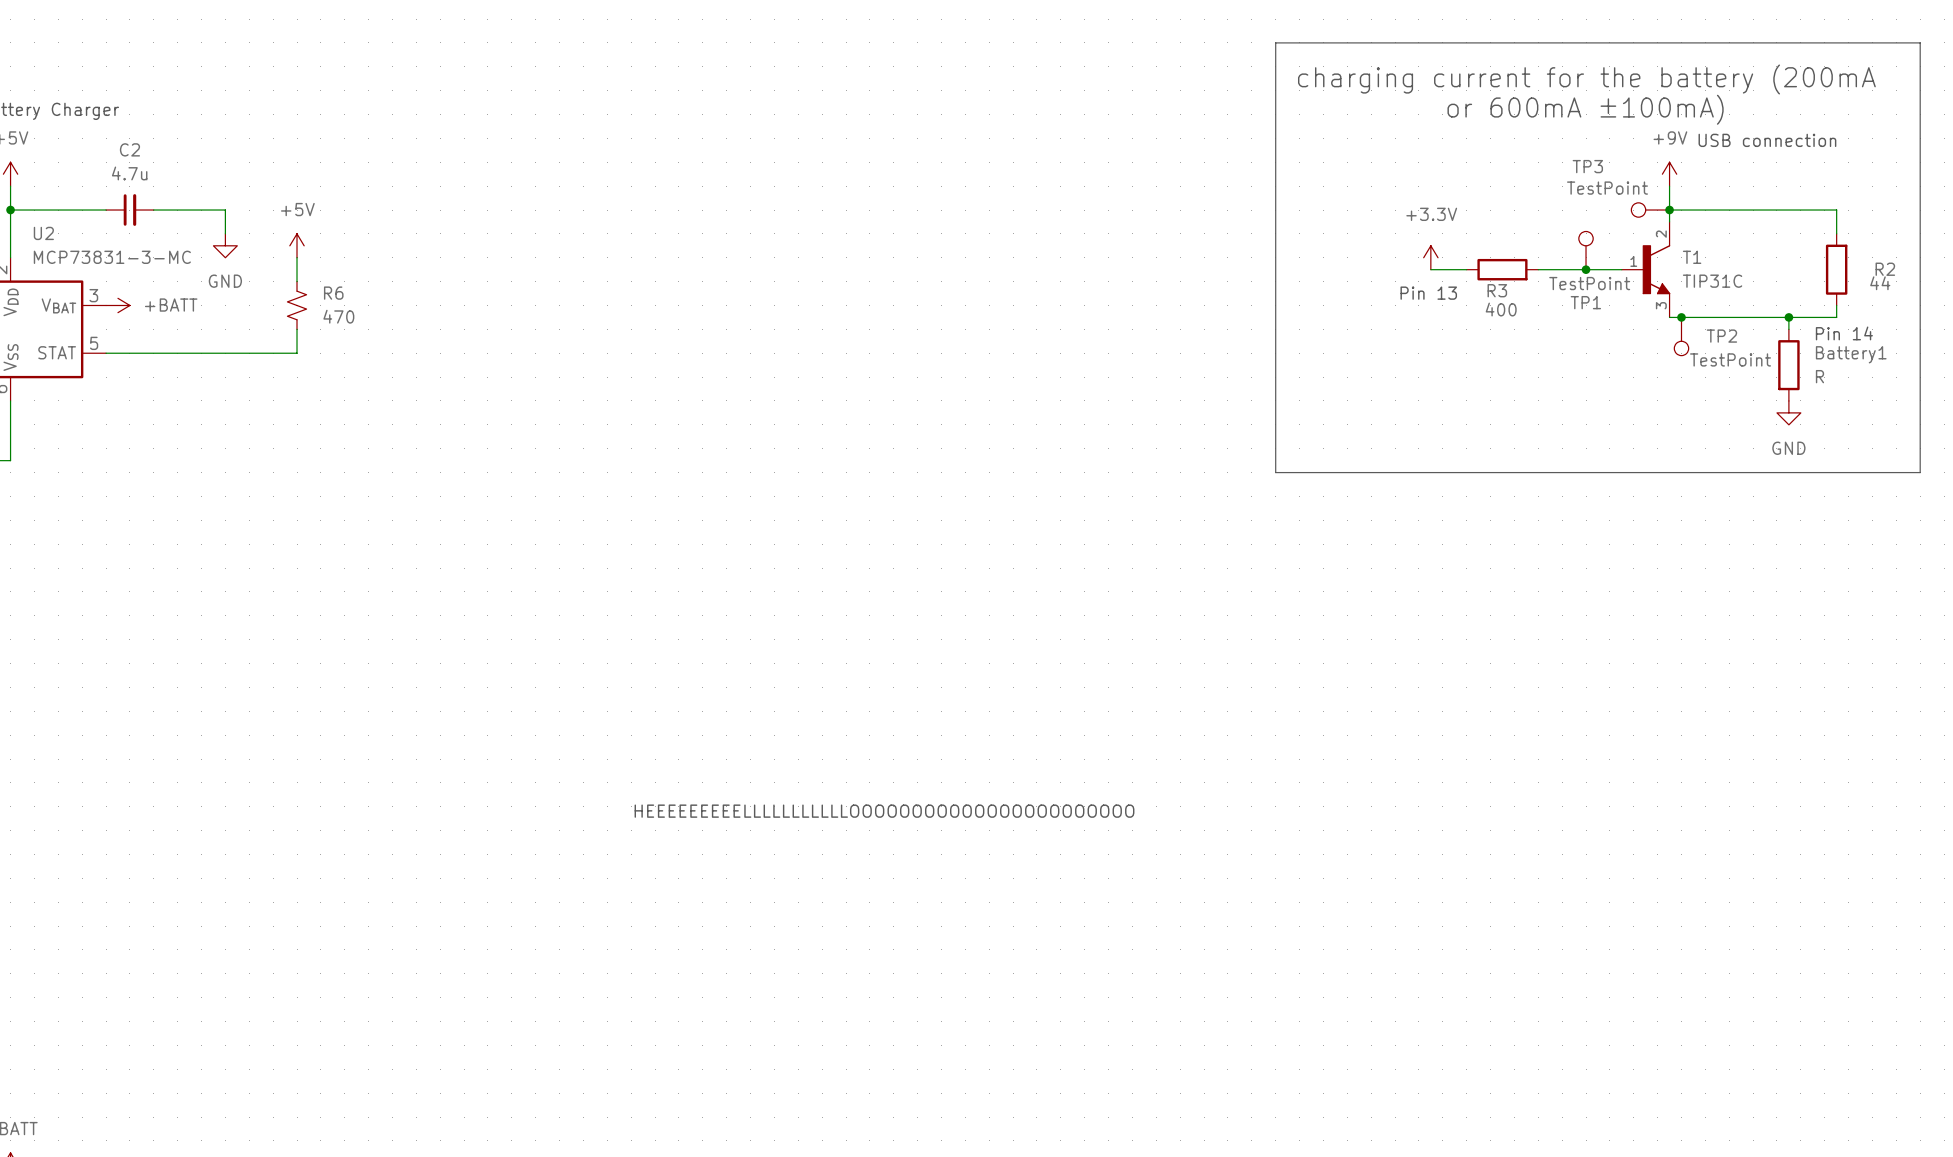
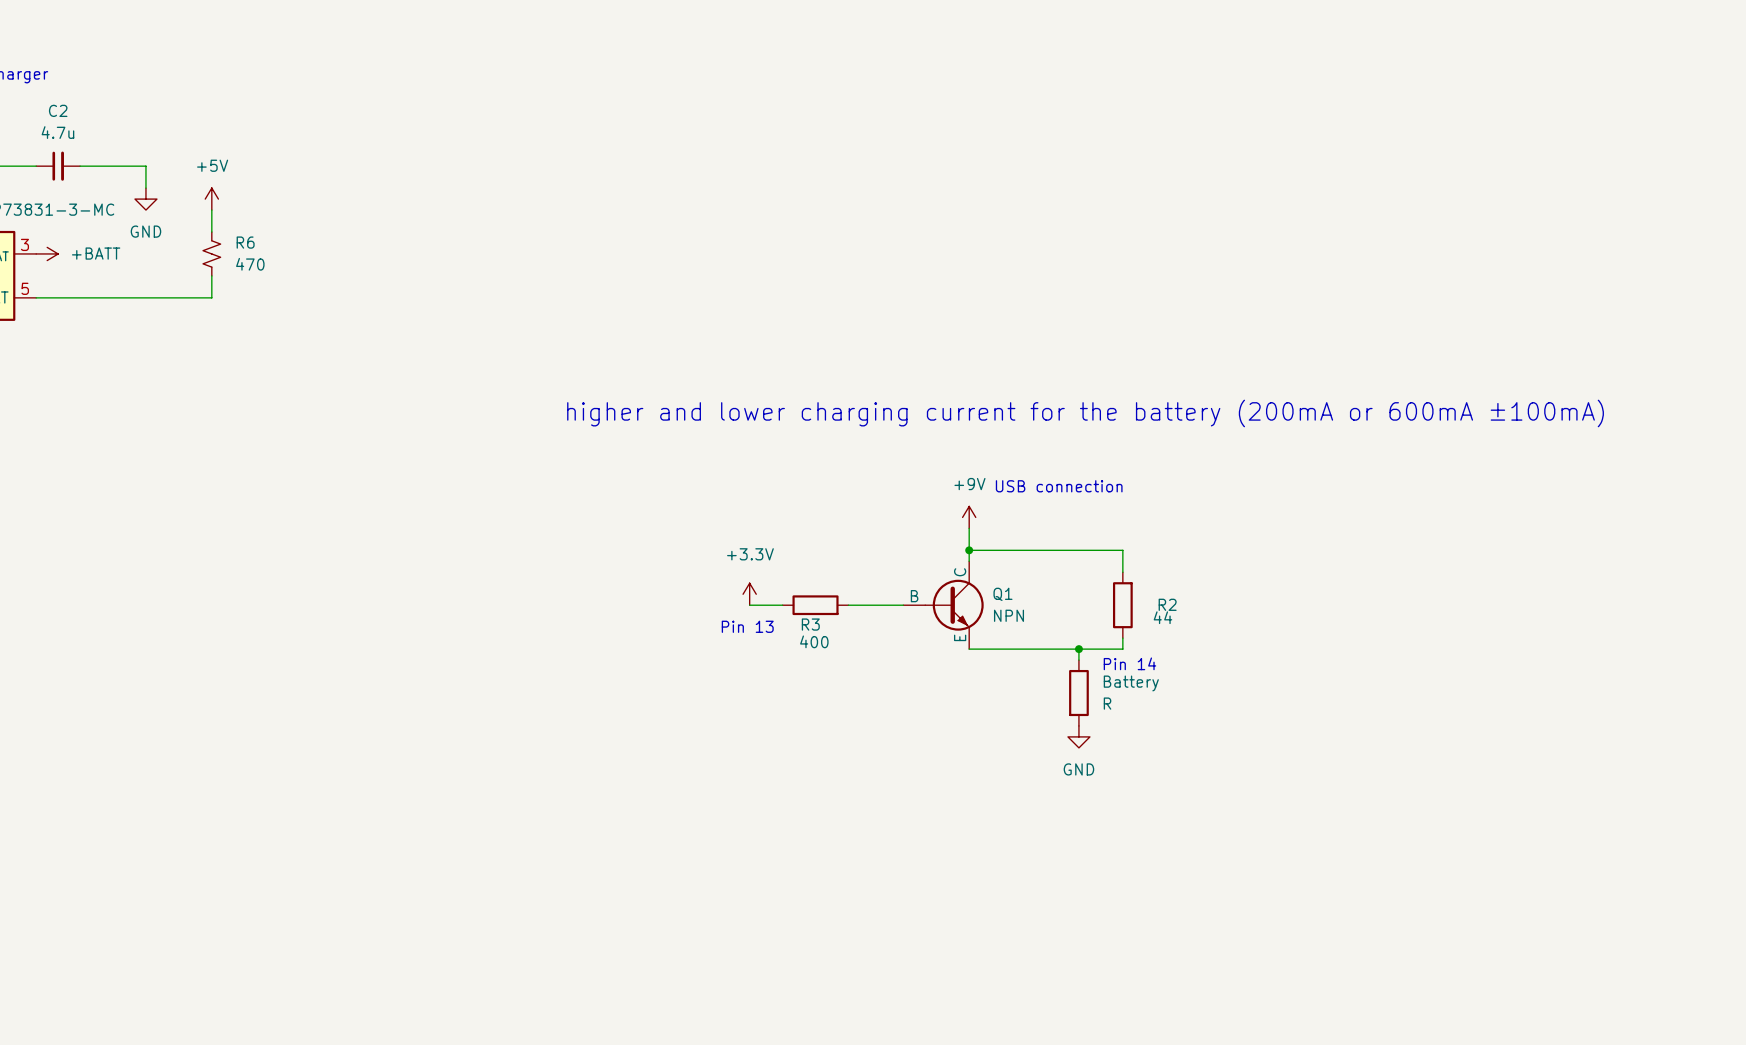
line: (1275, 42) (1920, 42) (1920, 472) (1275, 472) (1275, 42) -> none
text: charging current for the battery (200mA (1586, 79) -> none
text: or 600mA ±100mA) (1585, 109) -> none
text: USB connection (1767, 140) -> none
power symbol: +9V (1669, 174) -> none
wire: (1669, 186) (1669, 221) -> none
TP3: TestPoint (1650, 210) -> none
wire: (1669, 210) (1836, 210) (1836, 233) -> none
junction: (1669, 210) -> none
TP1: TestPoint (1586, 250) -> none
power symbol: +3.3V (1430, 257) -> none
wire: (1430, 269) (1466, 269) -> none
R3 position: (1502, 269) -> (815, 605)
wire: (1538, 269) (1621, 269) -> none
junction: (1586, 269) -> none
T1: TIP31C (1646, 269) -> none
R2 position: (1836, 269) -> (1122, 605)
text: Pin 13 (1428, 293) -> none
wire: (1836, 305) (1836, 317) (1669, 317) -> none
junction: (1681, 317) -> none
wire: (1788, 317) (1788, 329) -> none
junction: (1788, 317) -> none
text: Pin 14 (1844, 333) -> none
TP2: TestPoint (1681, 336) -> none
Battery1: R (1788, 365) -> none
power symbol: GND (1788, 412) -> none
text: none -> higher and lower charging current for the battery (200mA or 600mA ±100mA) (1085, 413)
text: none -> USB connection (1059, 486)
power symbol: none -> +9V (969, 517)
wire: none -> (969, 528) (969, 561)
wire: none -> (969, 550) (1122, 550) (1122, 572)
junction: none -> (969, 550)
power symbol: none -> +3.3V (749, 594)
wire: none -> (749, 605) (782, 605)
wire: none -> (848, 605) (903, 605)
Q1: none -> NPN (943, 605)
text: none -> Pin 13 (747, 626)
wire: none -> (1122, 638) (1122, 649) (969, 649)
wire: none -> (1078, 649) (1078, 660)
junction: none -> (1078, 649)
text: none -> Pin 14 (1129, 663)
Battery: none -> R (1078, 693)
text: HEEEEEEEEELLLLLLLLLLLOOOOOOOOOOOOOOOOOOOOOOO (884, 811) -> none
power symbol: none -> GND (1078, 736)

